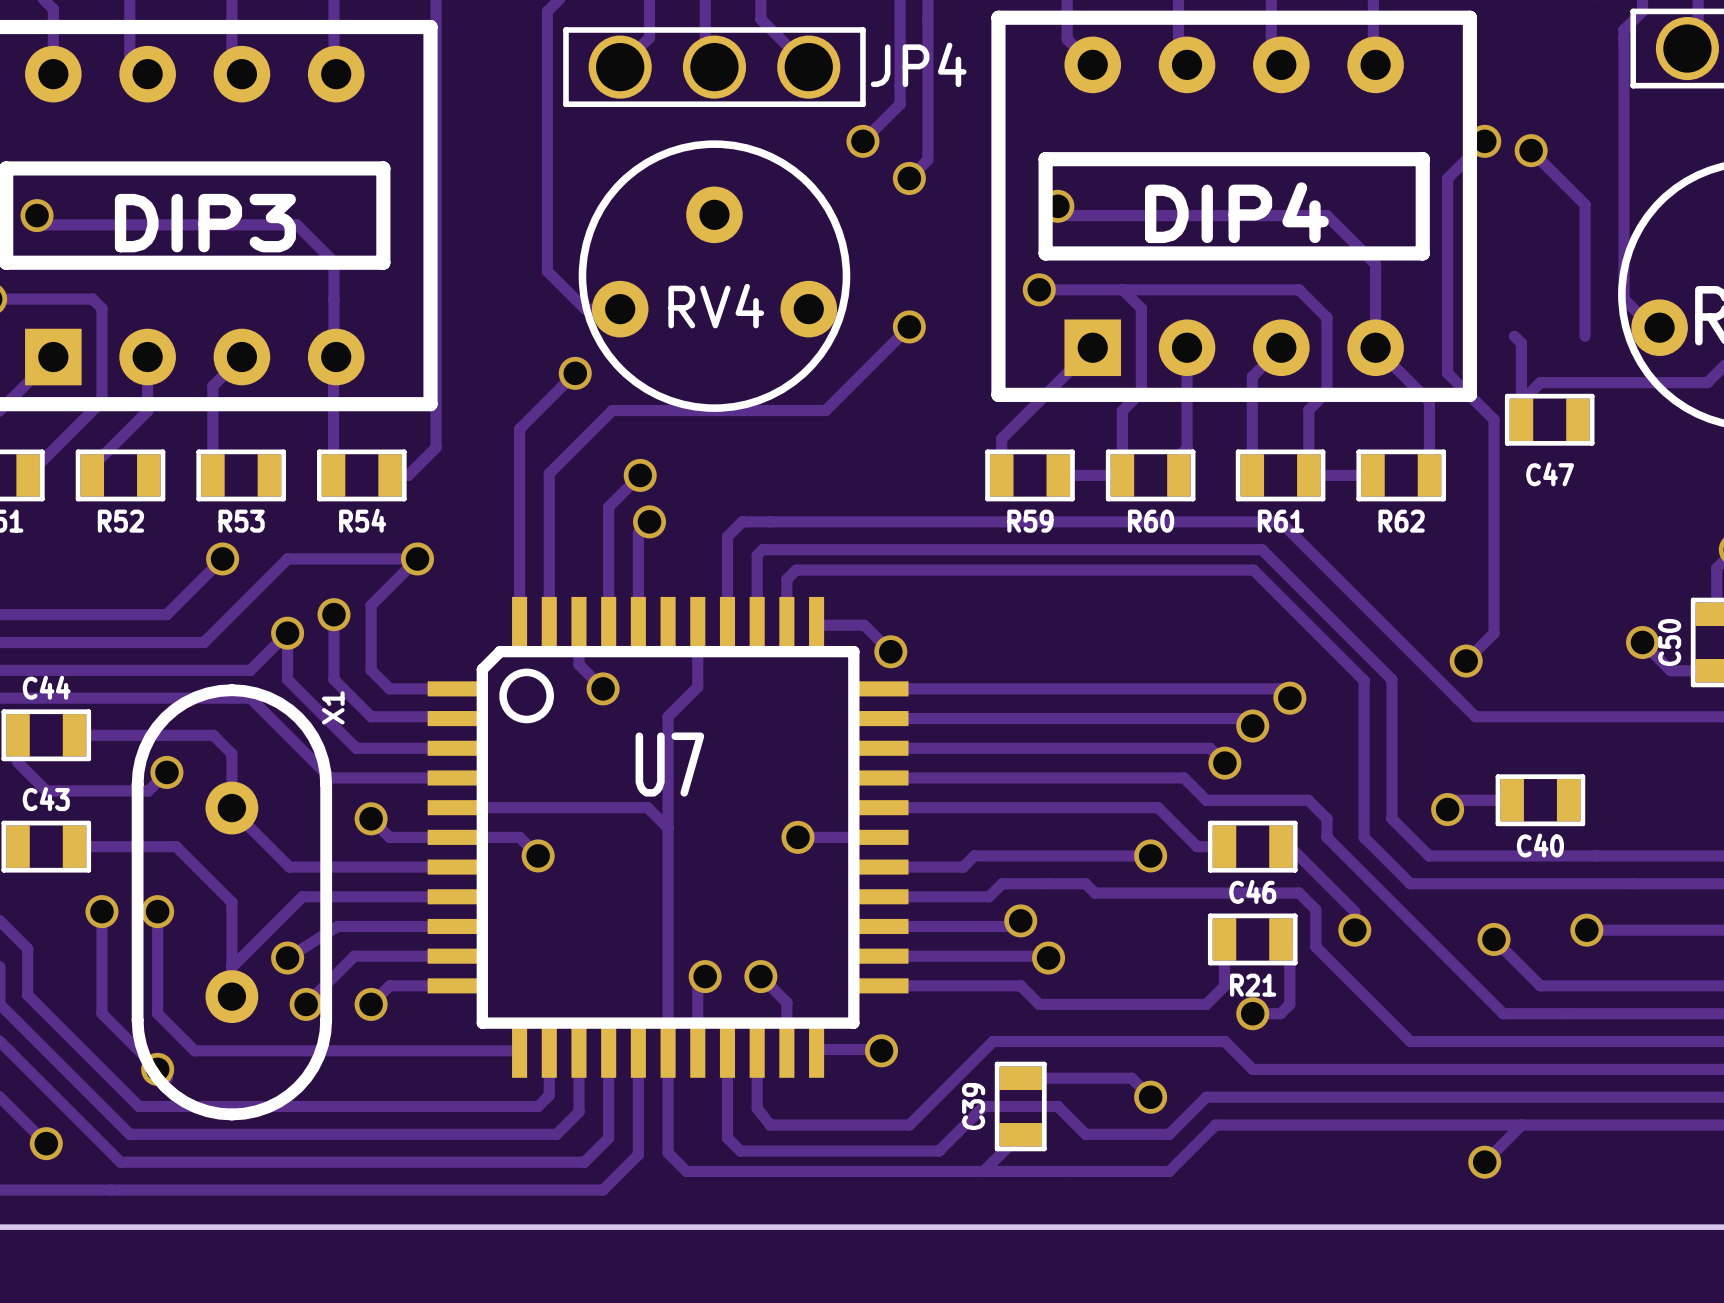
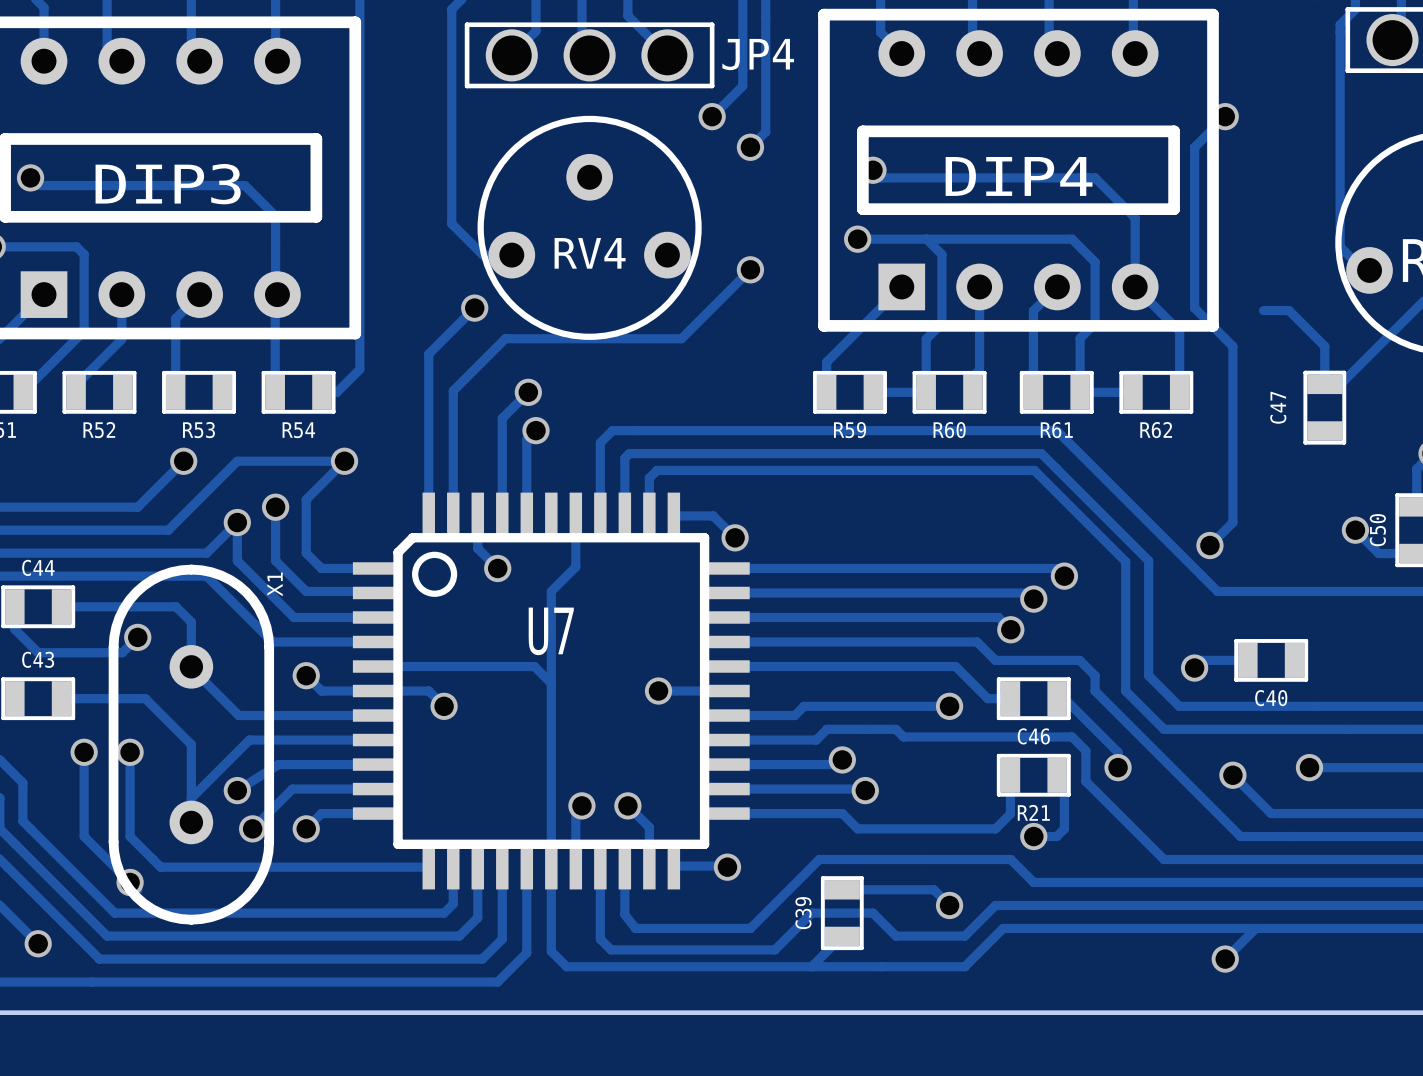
track: (1531, 150) (1585, 204) (1585, 336) -> none
via: (1531, 150) -> none
track: (1514, 336) (1521, 343) (1521, 419) -> none
track: (1707, 382) (1540, 382) (1521, 401) -> (1409, 315) (1340, 384) (1324, 384) (1324, 346) (1288, 310) (1263, 310)
C47 rotation: 0° (1549, 419) -> 90° clockwise (1324, 407)
C47 position: (1549, 419) -> (1324, 407)

